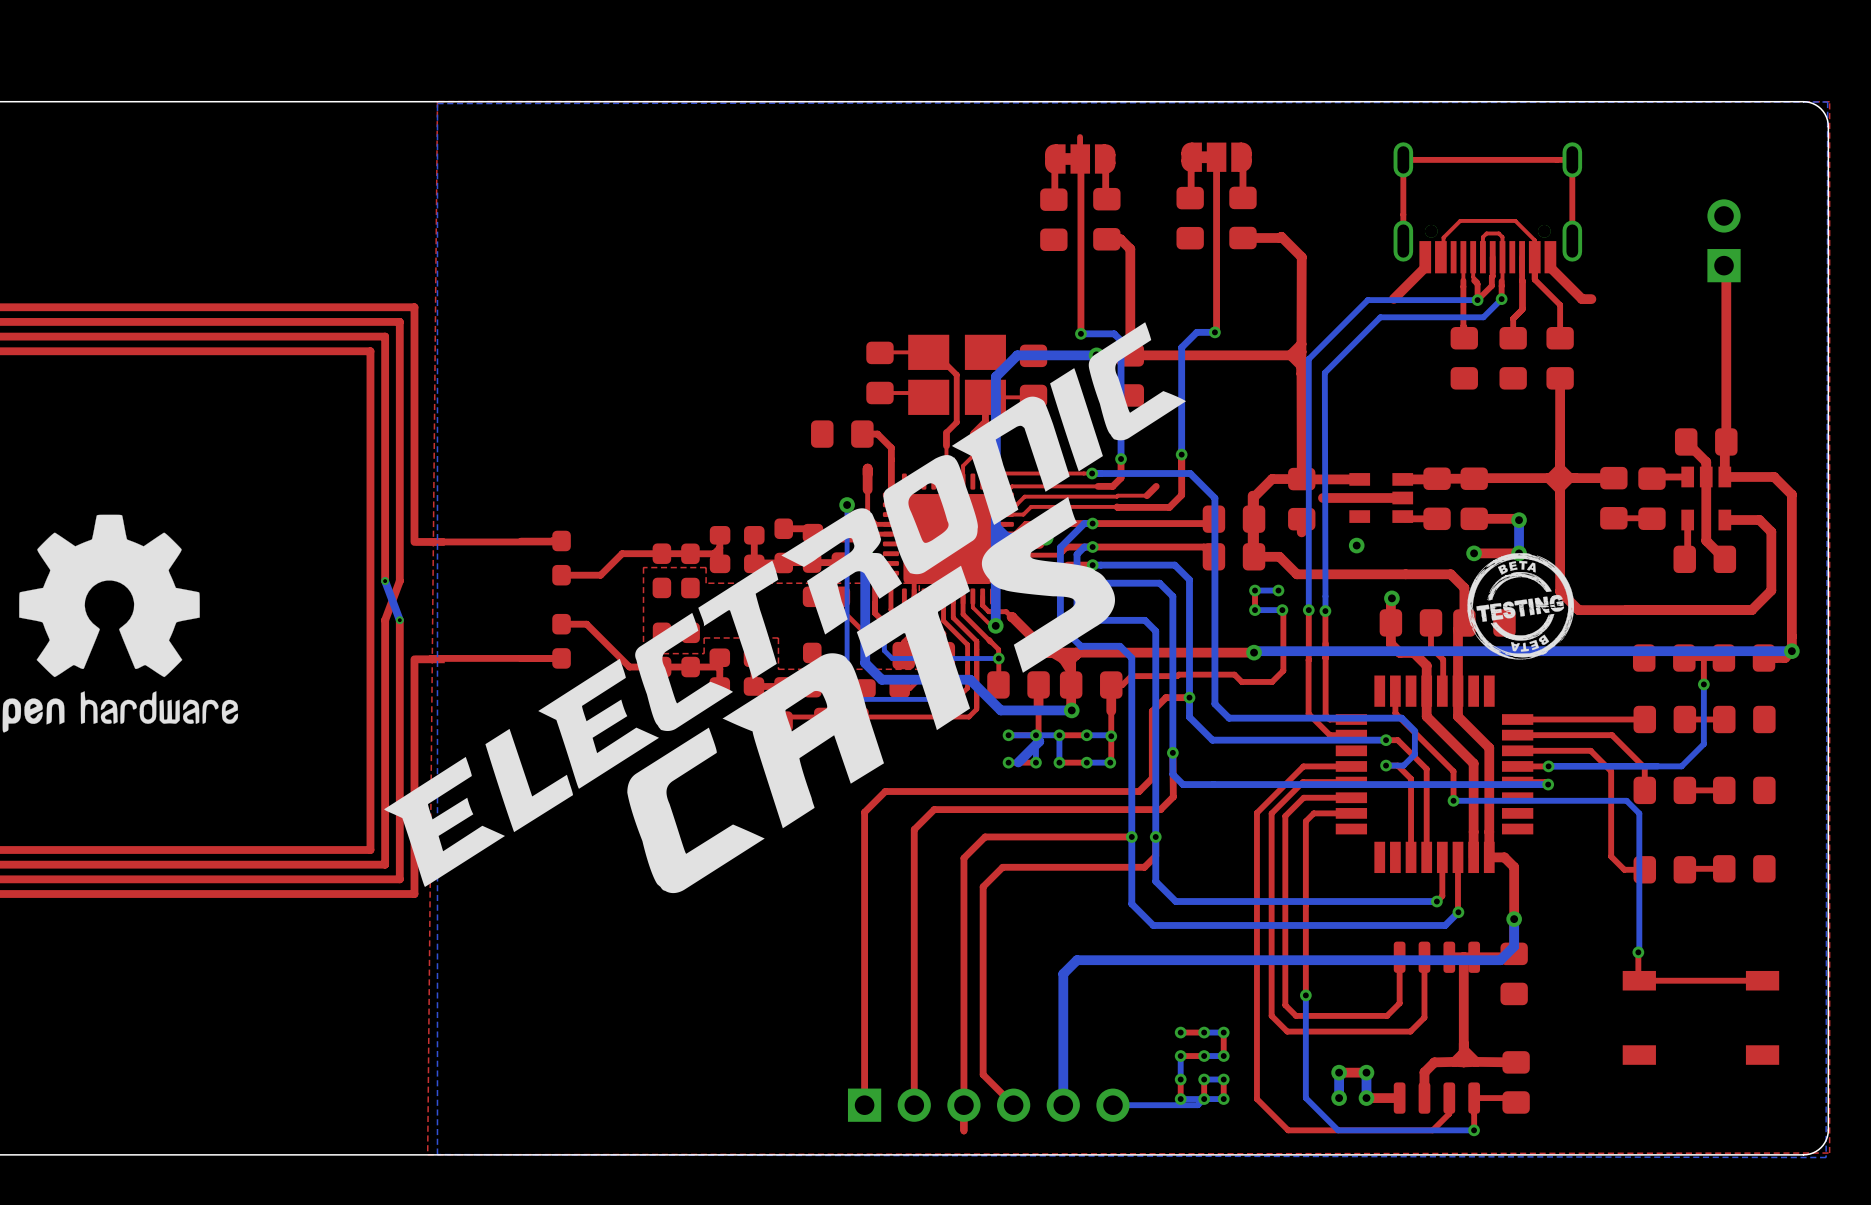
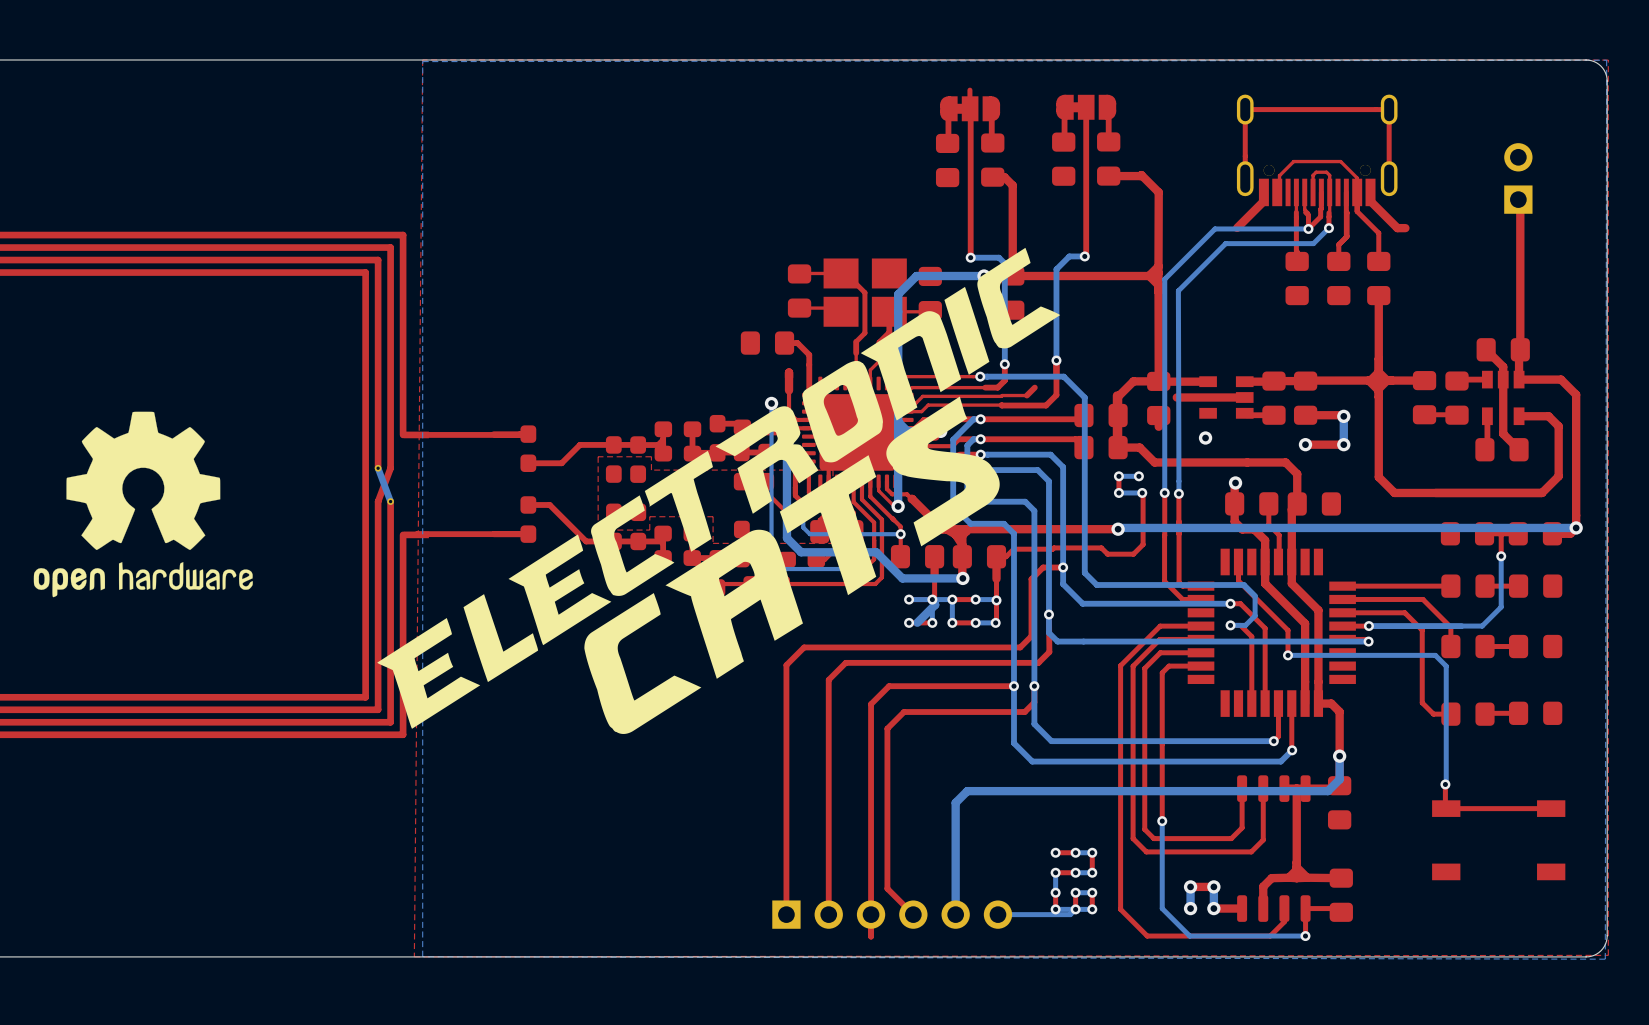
drawing: [1467, 553, 1575, 660] -> none

